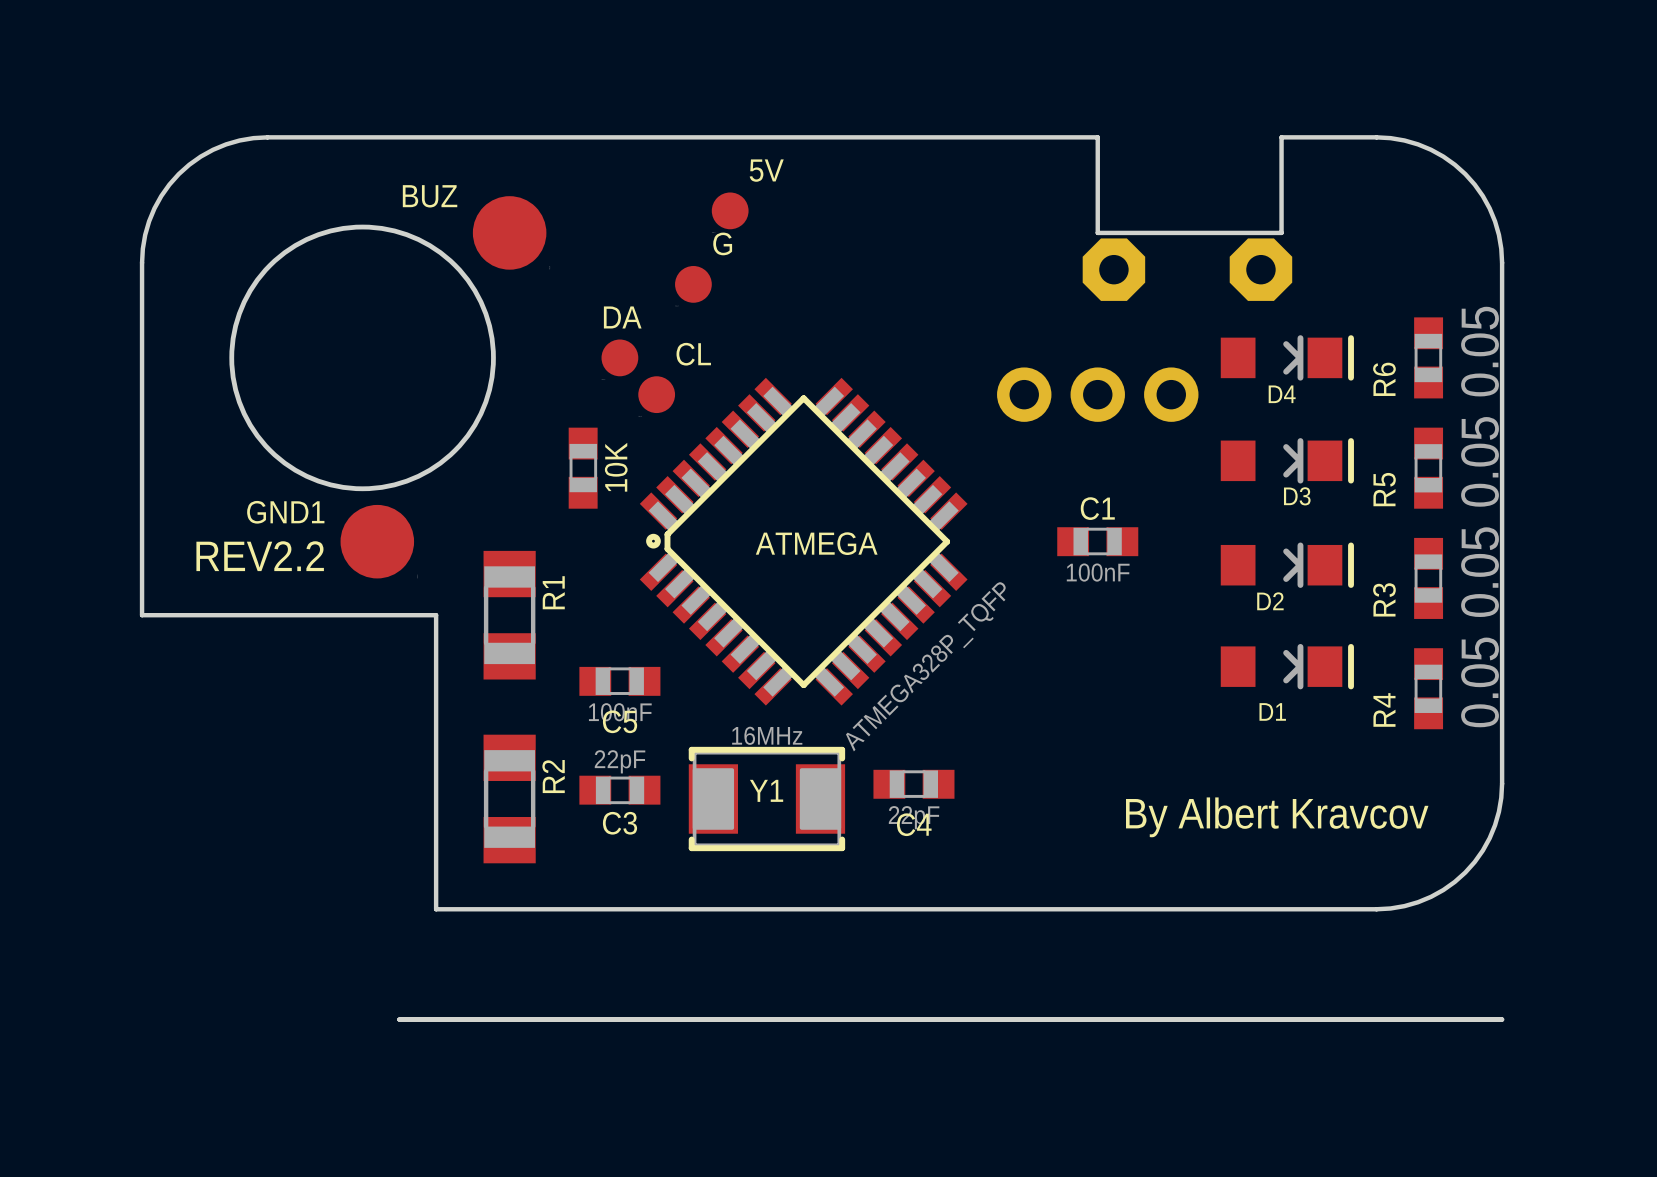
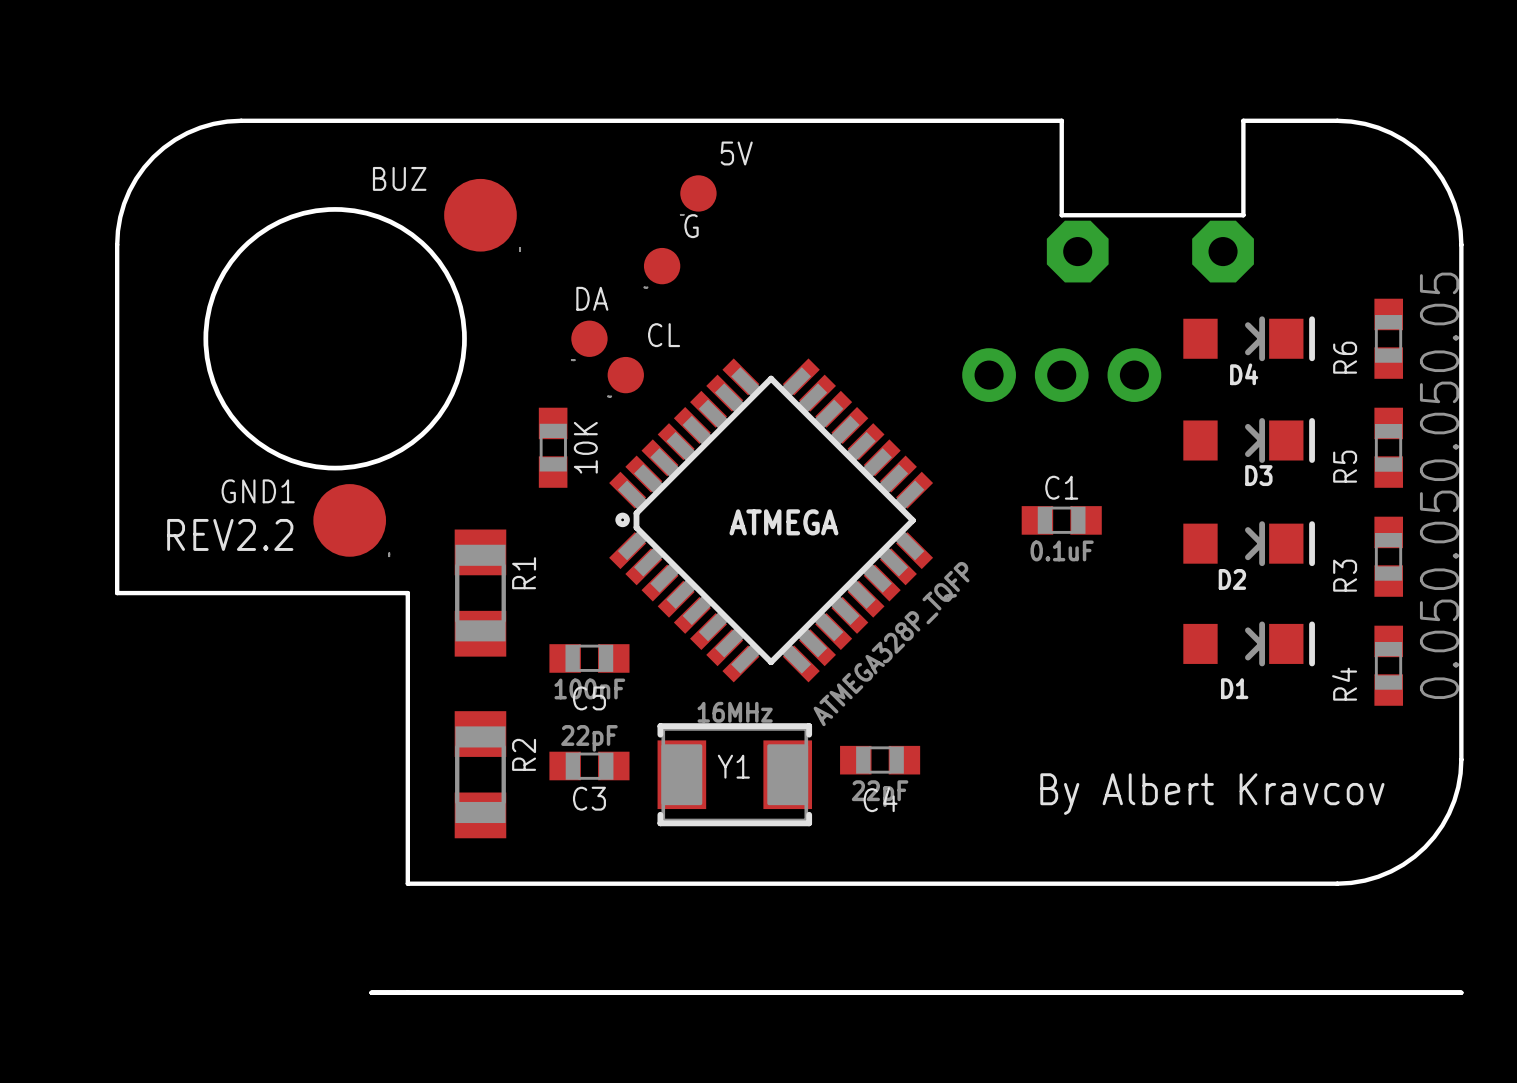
C1 value: 100nF (1098, 572) -> 0.1uF (1062, 550)

